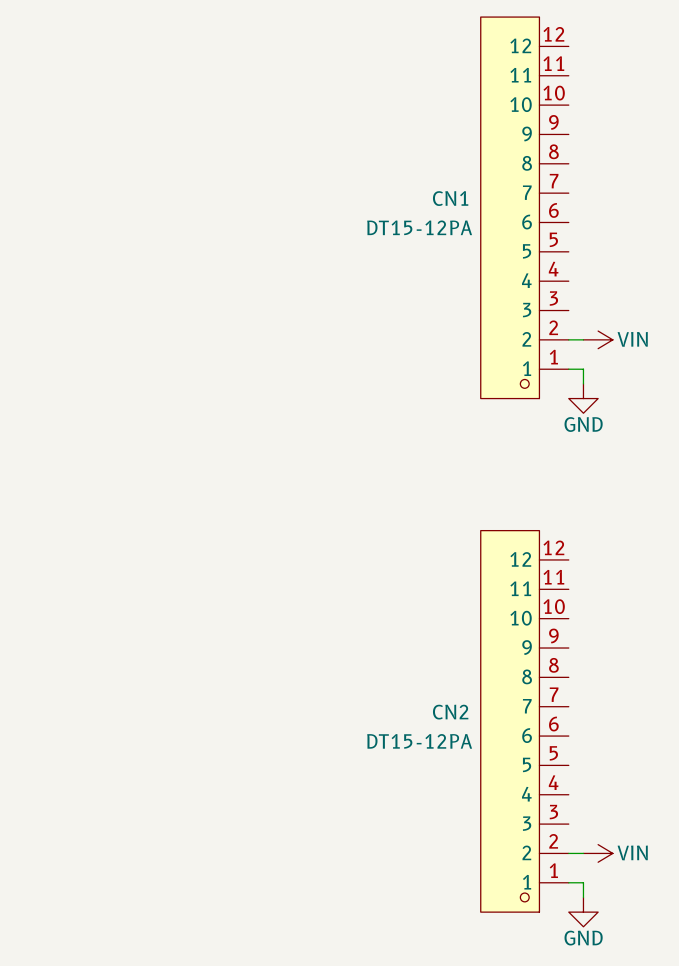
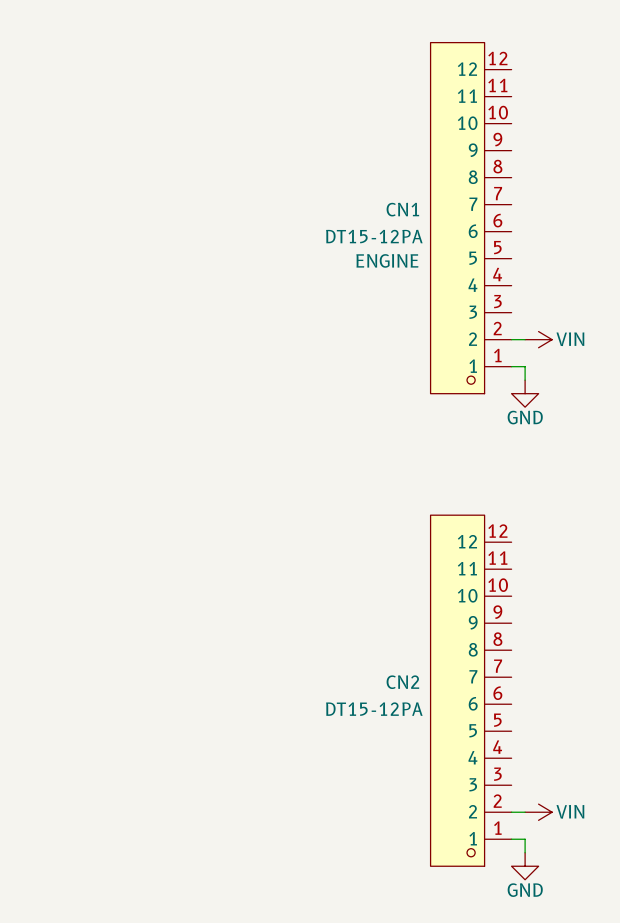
CN1 text: none -> ENGINE (387, 260)

